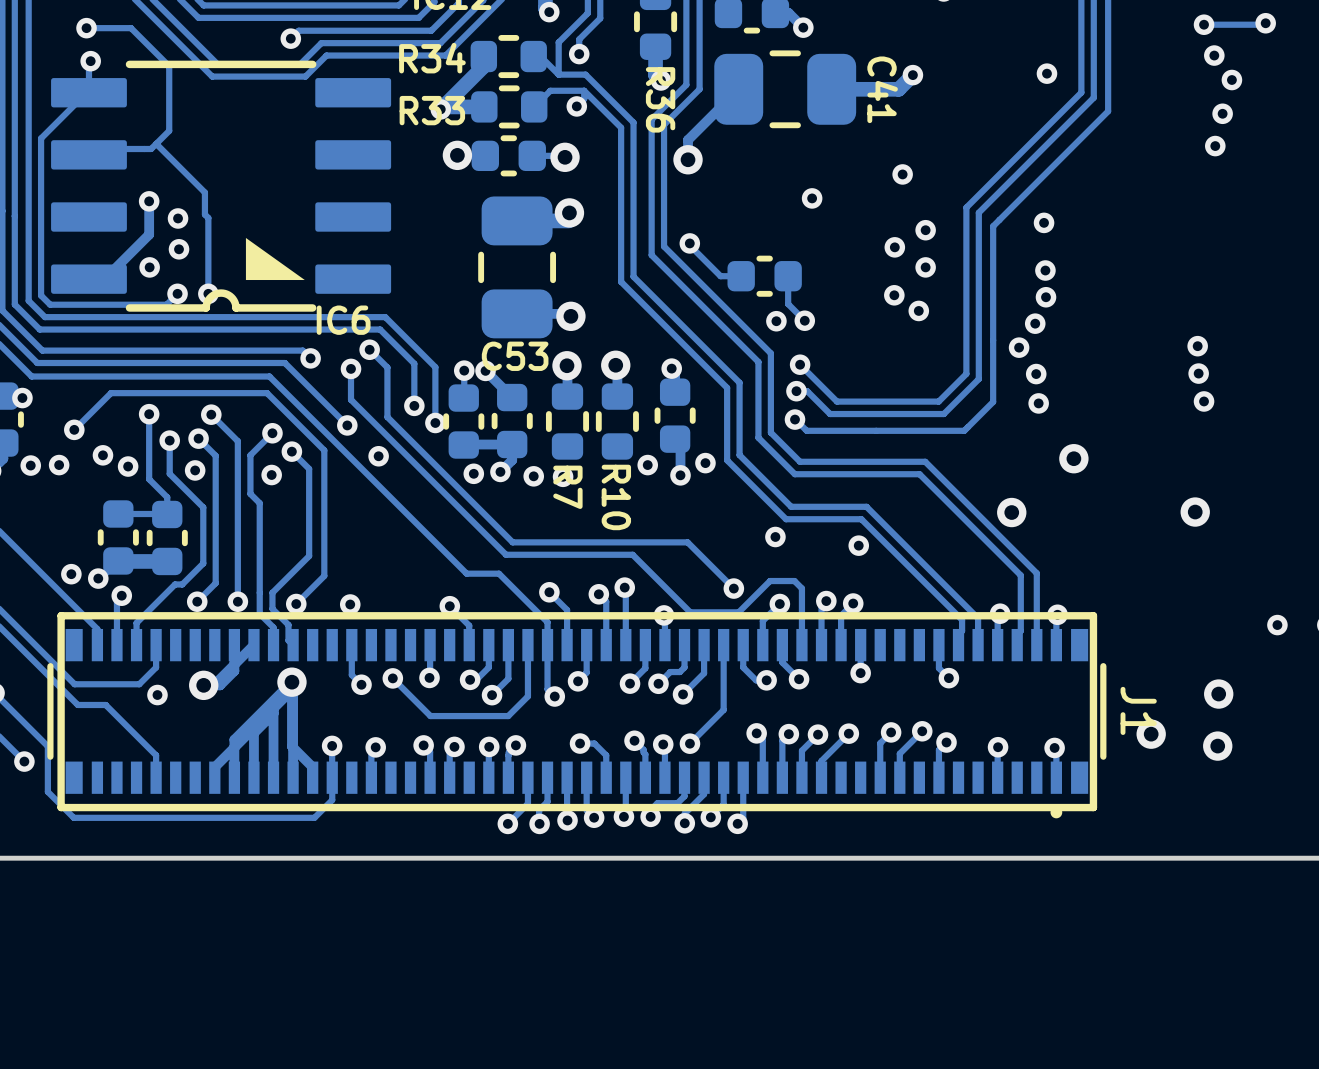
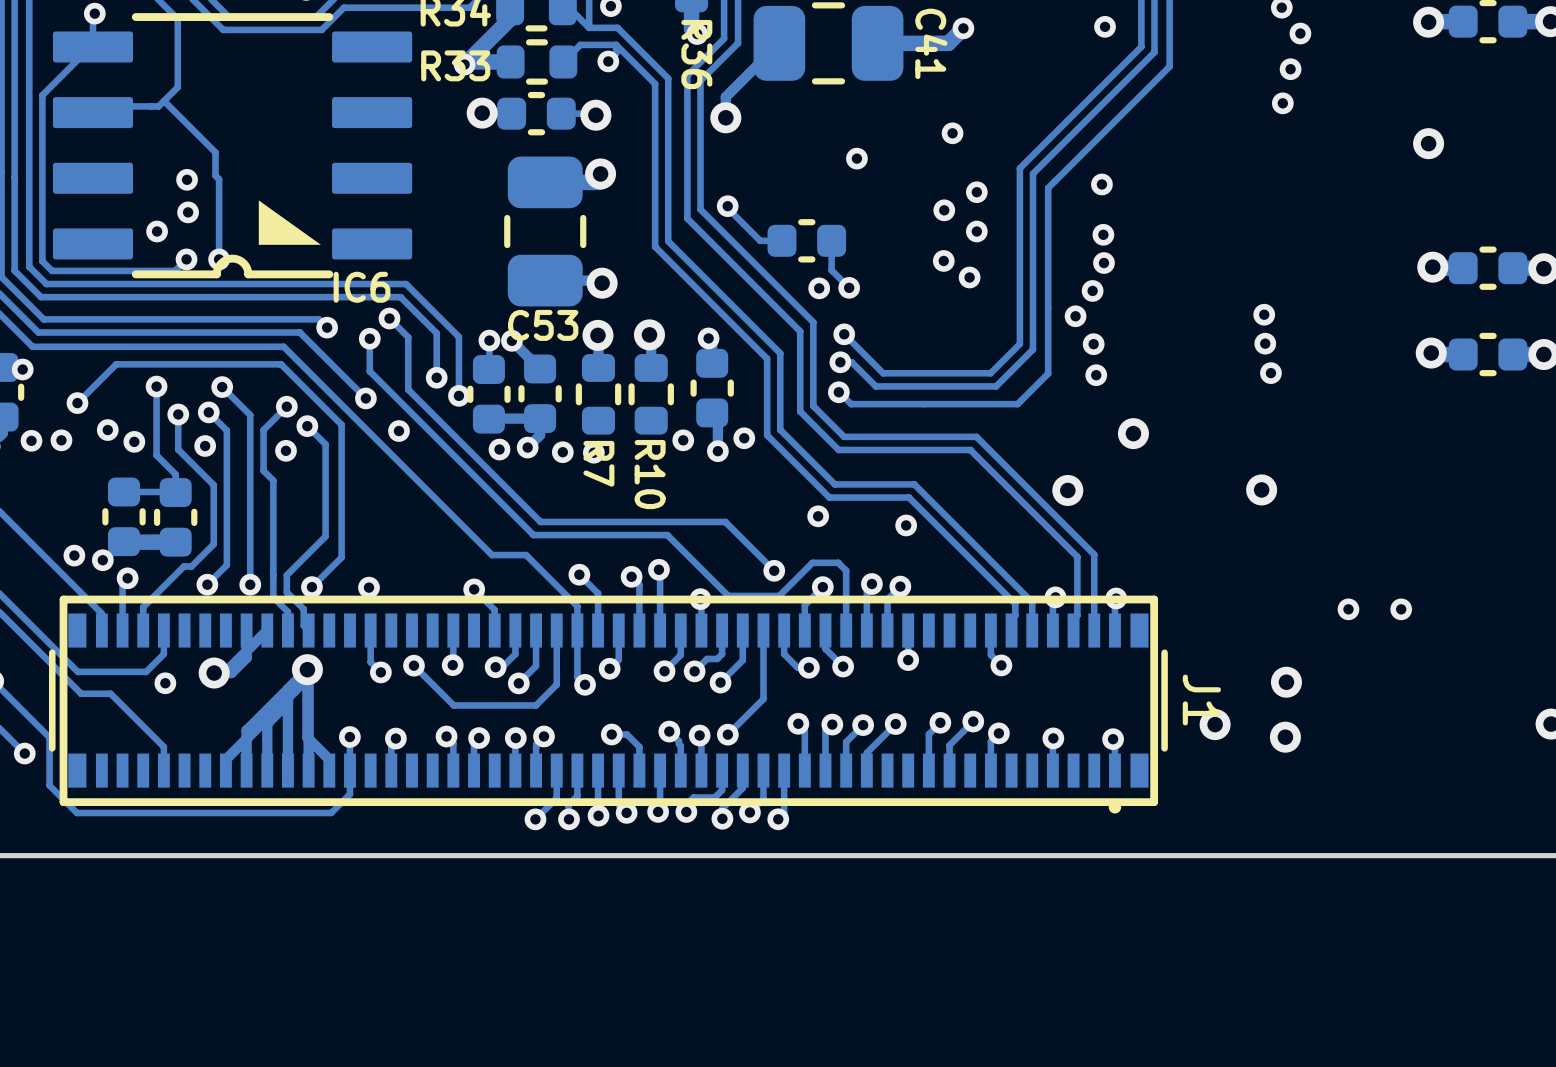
track: (149, 201) (149, 234) (104, 279) (88, 279) -> none
via: (149, 201) -> none

